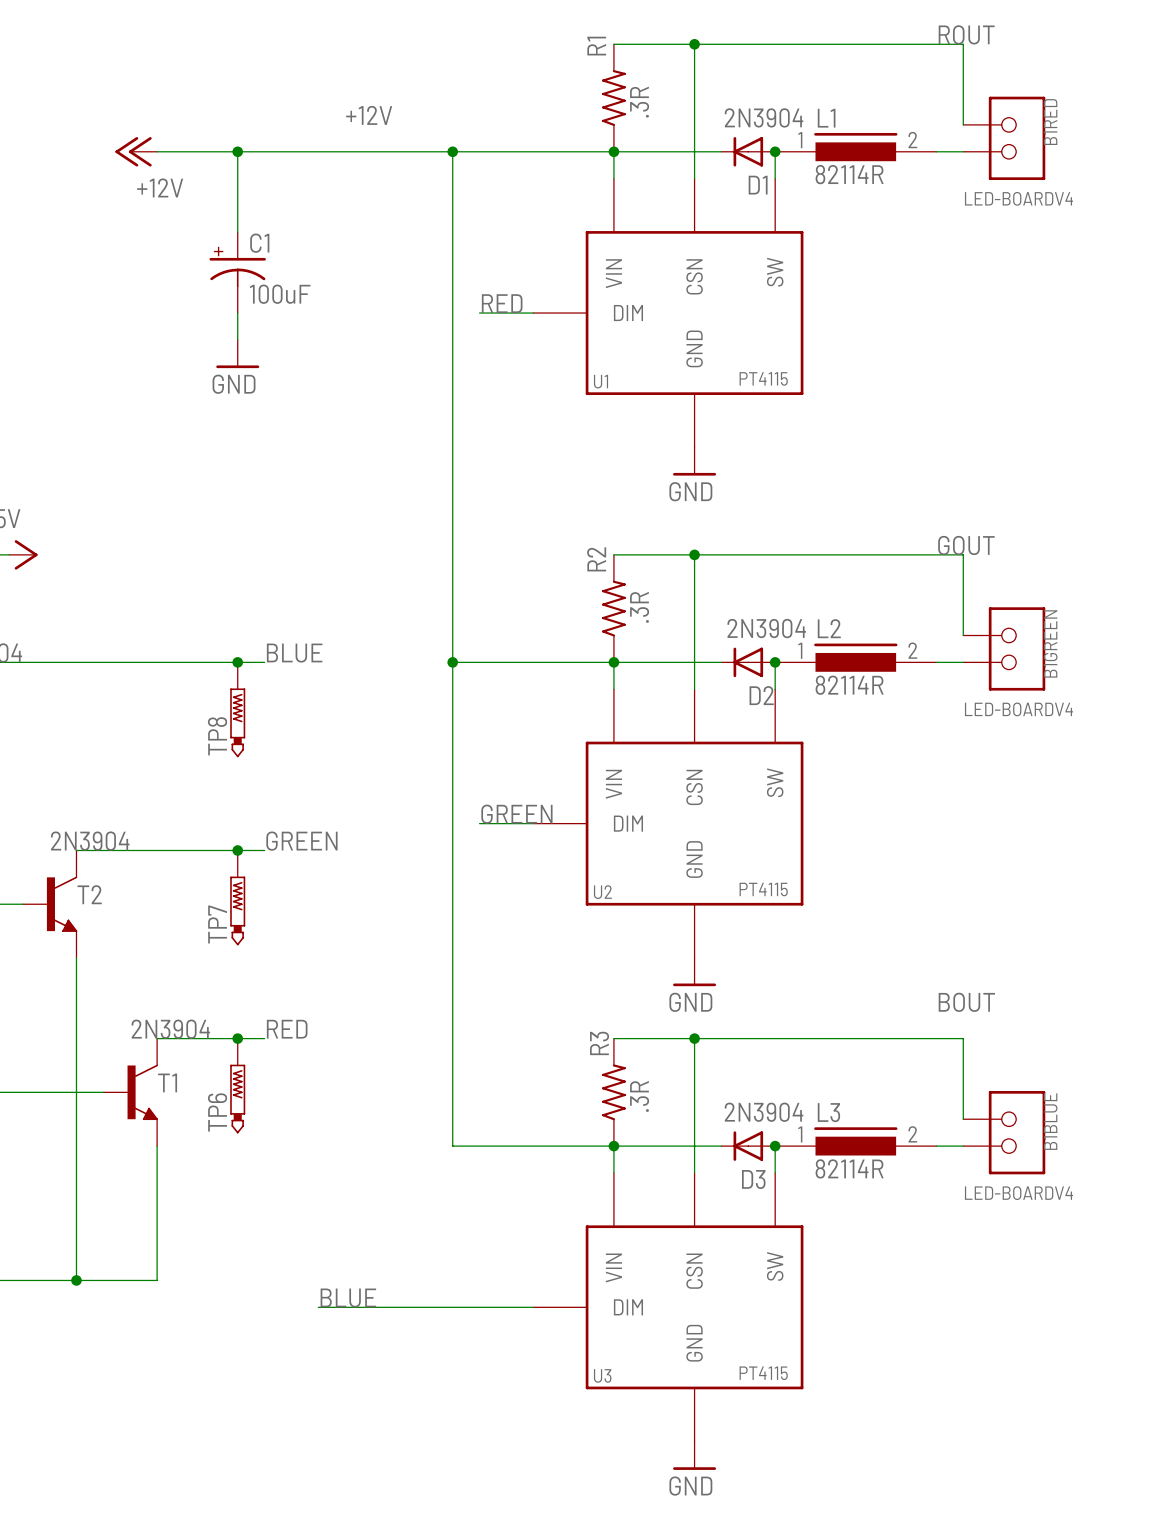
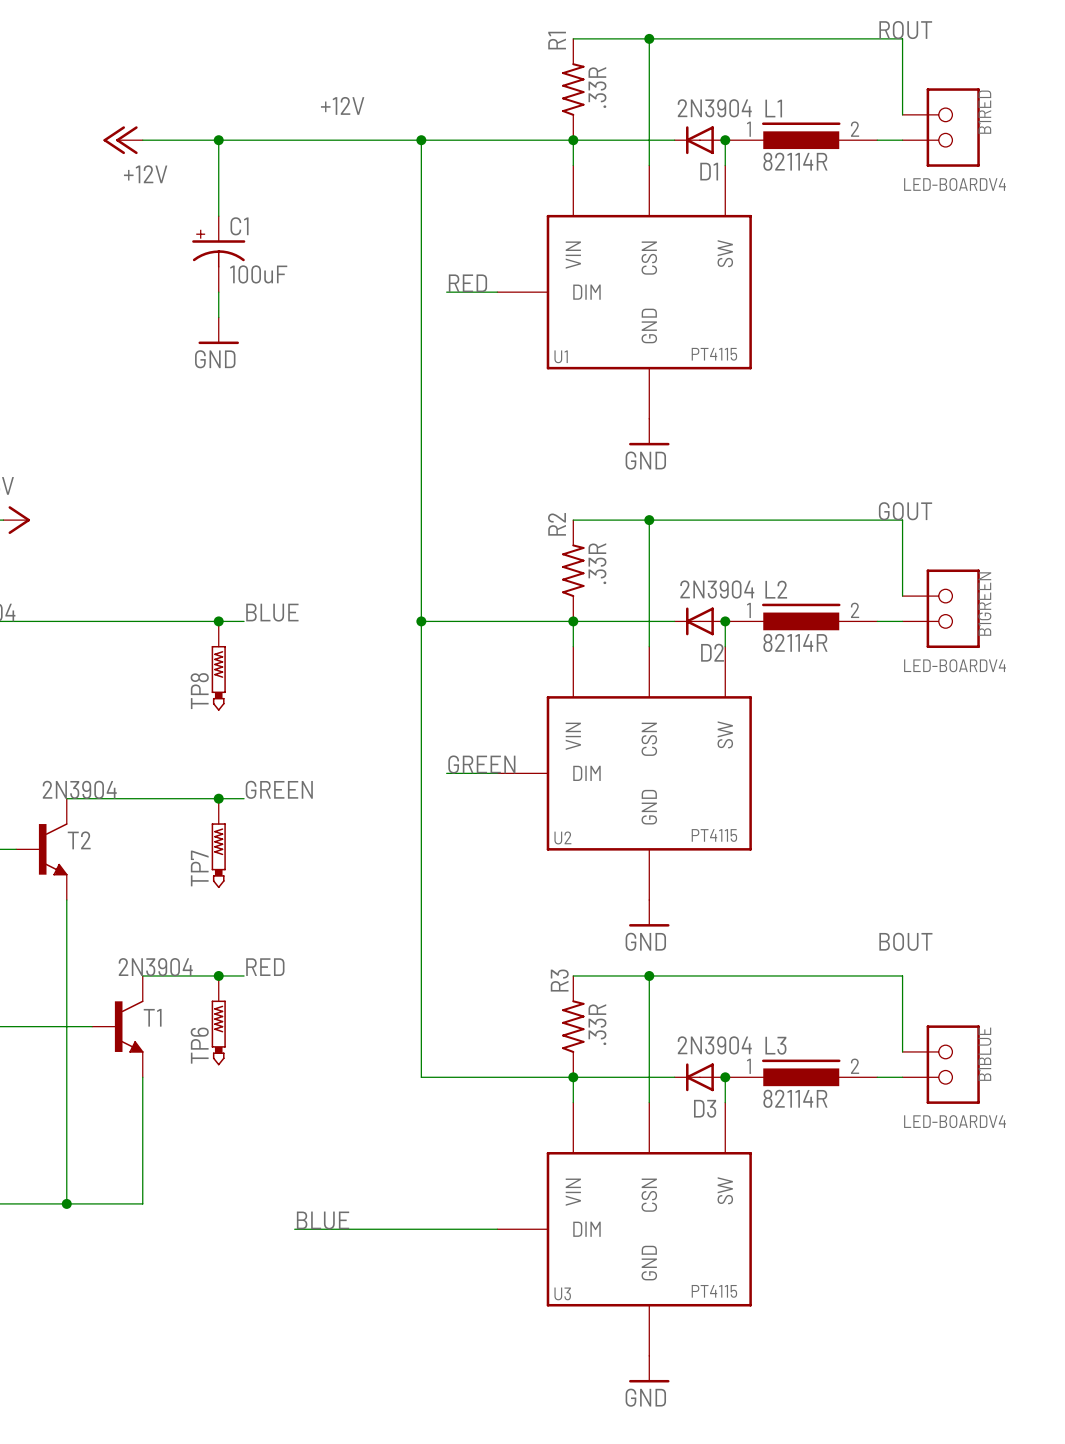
R1 value: .3R (639, 102) -> .33R (597, 87)
R2 value: .3R (639, 607) -> .33R (597, 563)
R3 value: .3R (639, 1096) -> .33R (597, 1024)

